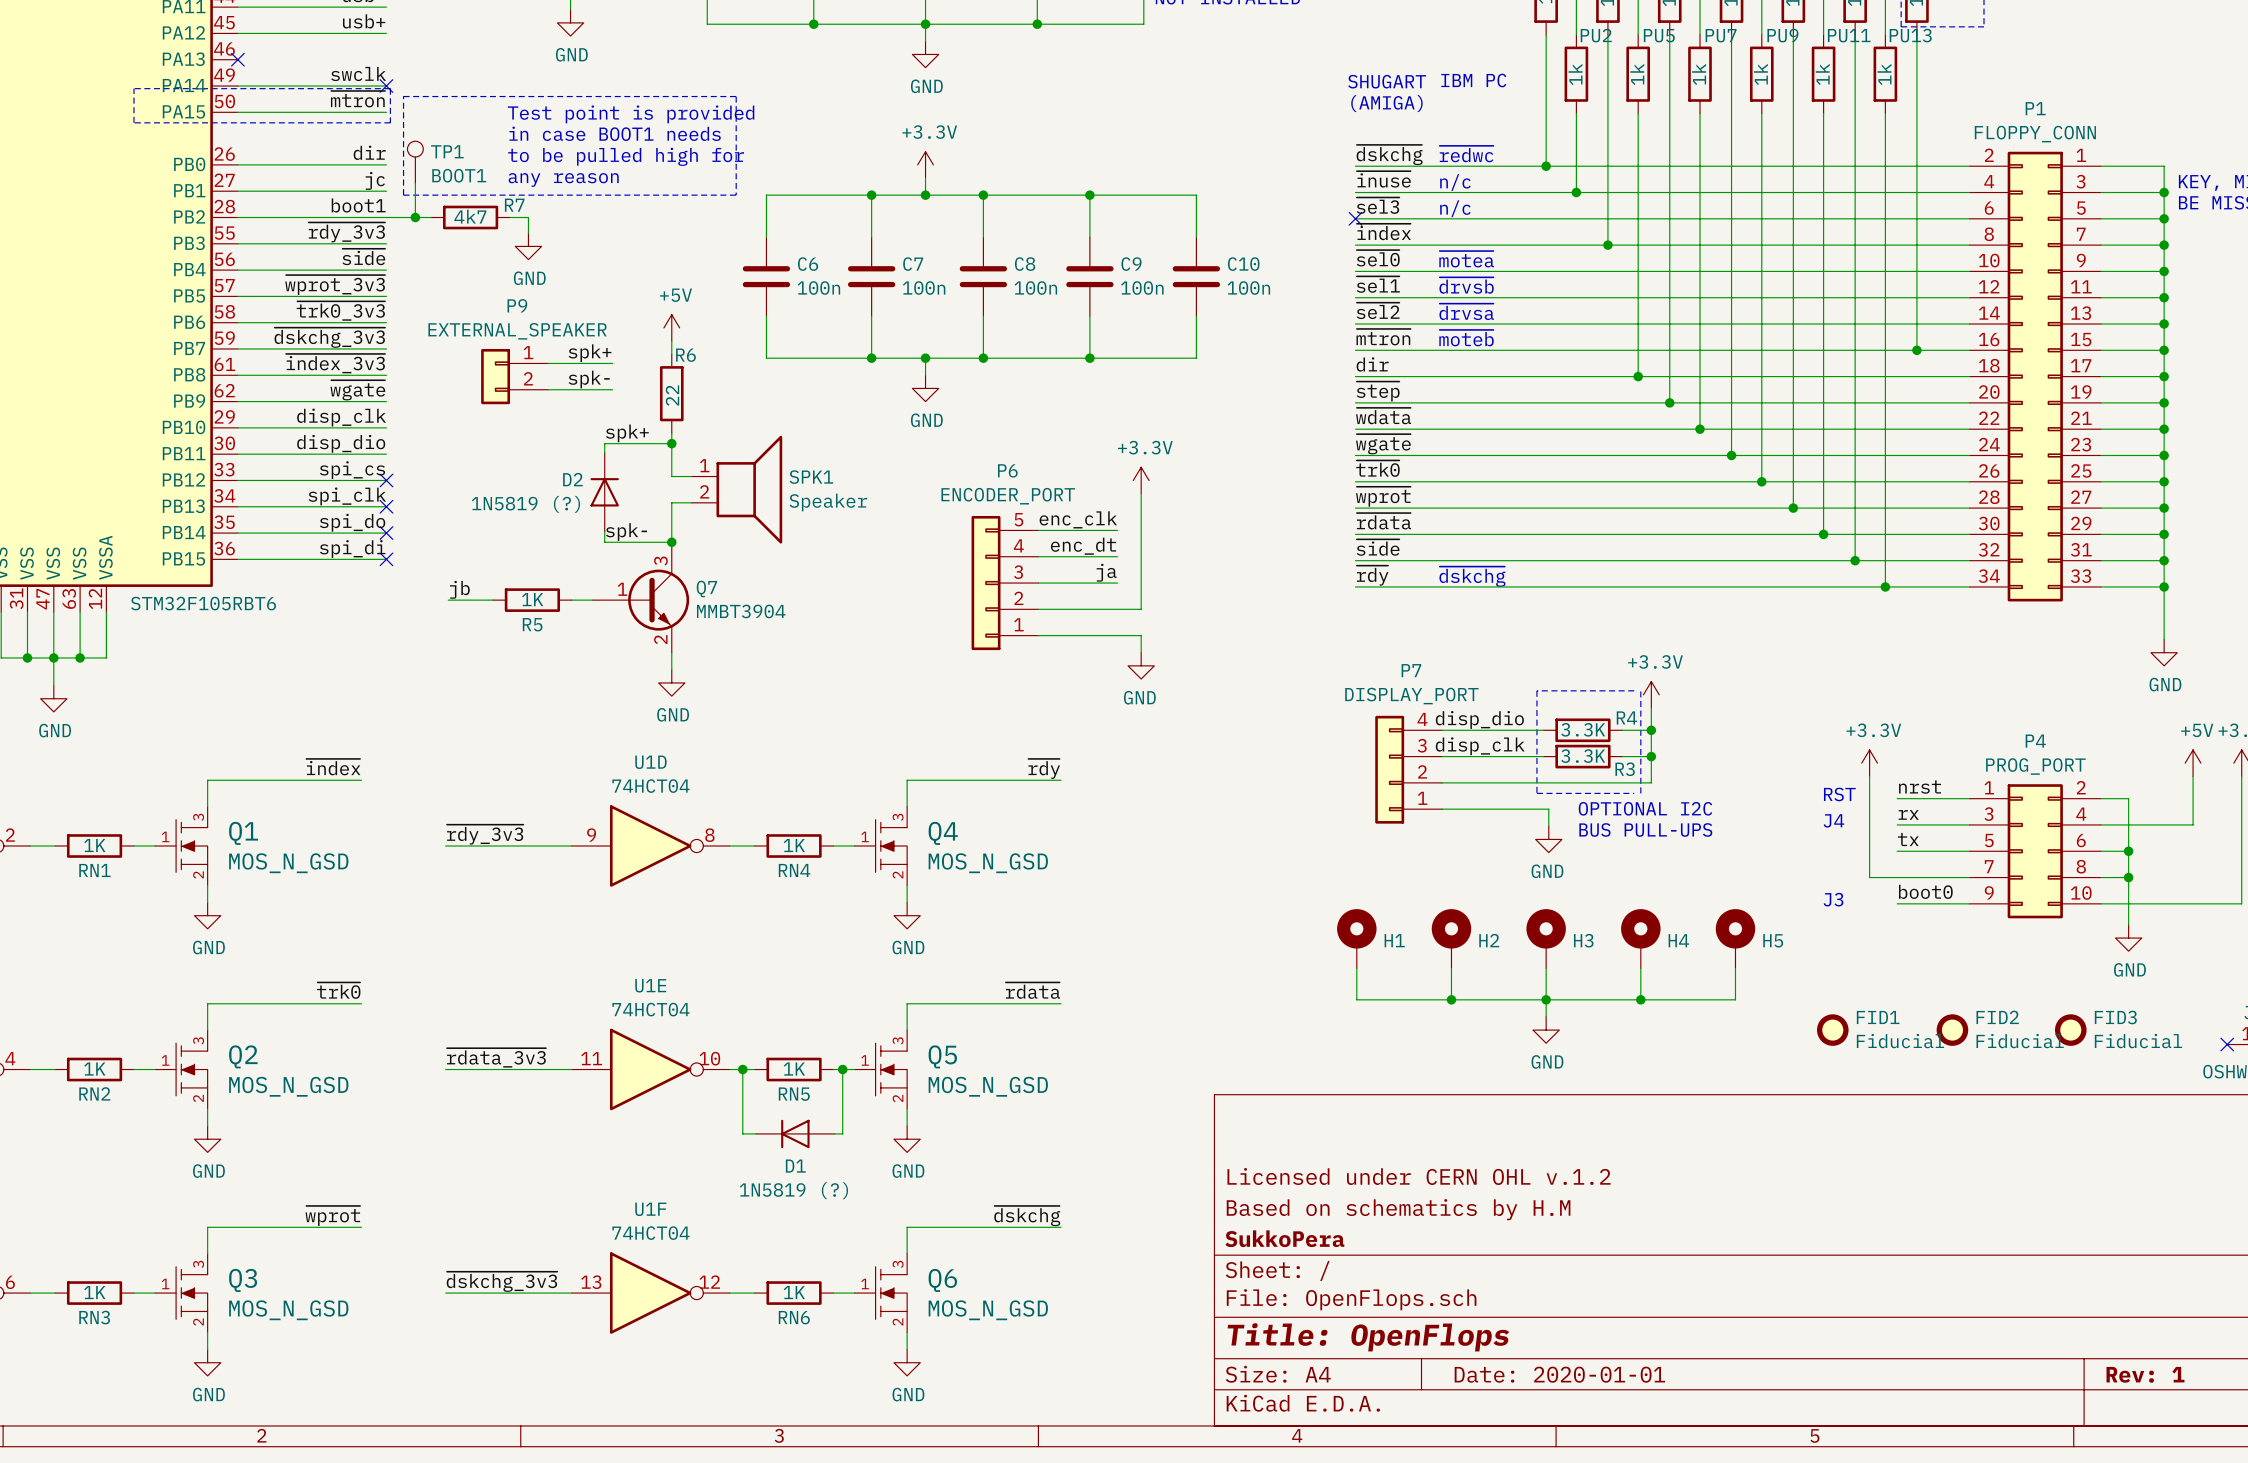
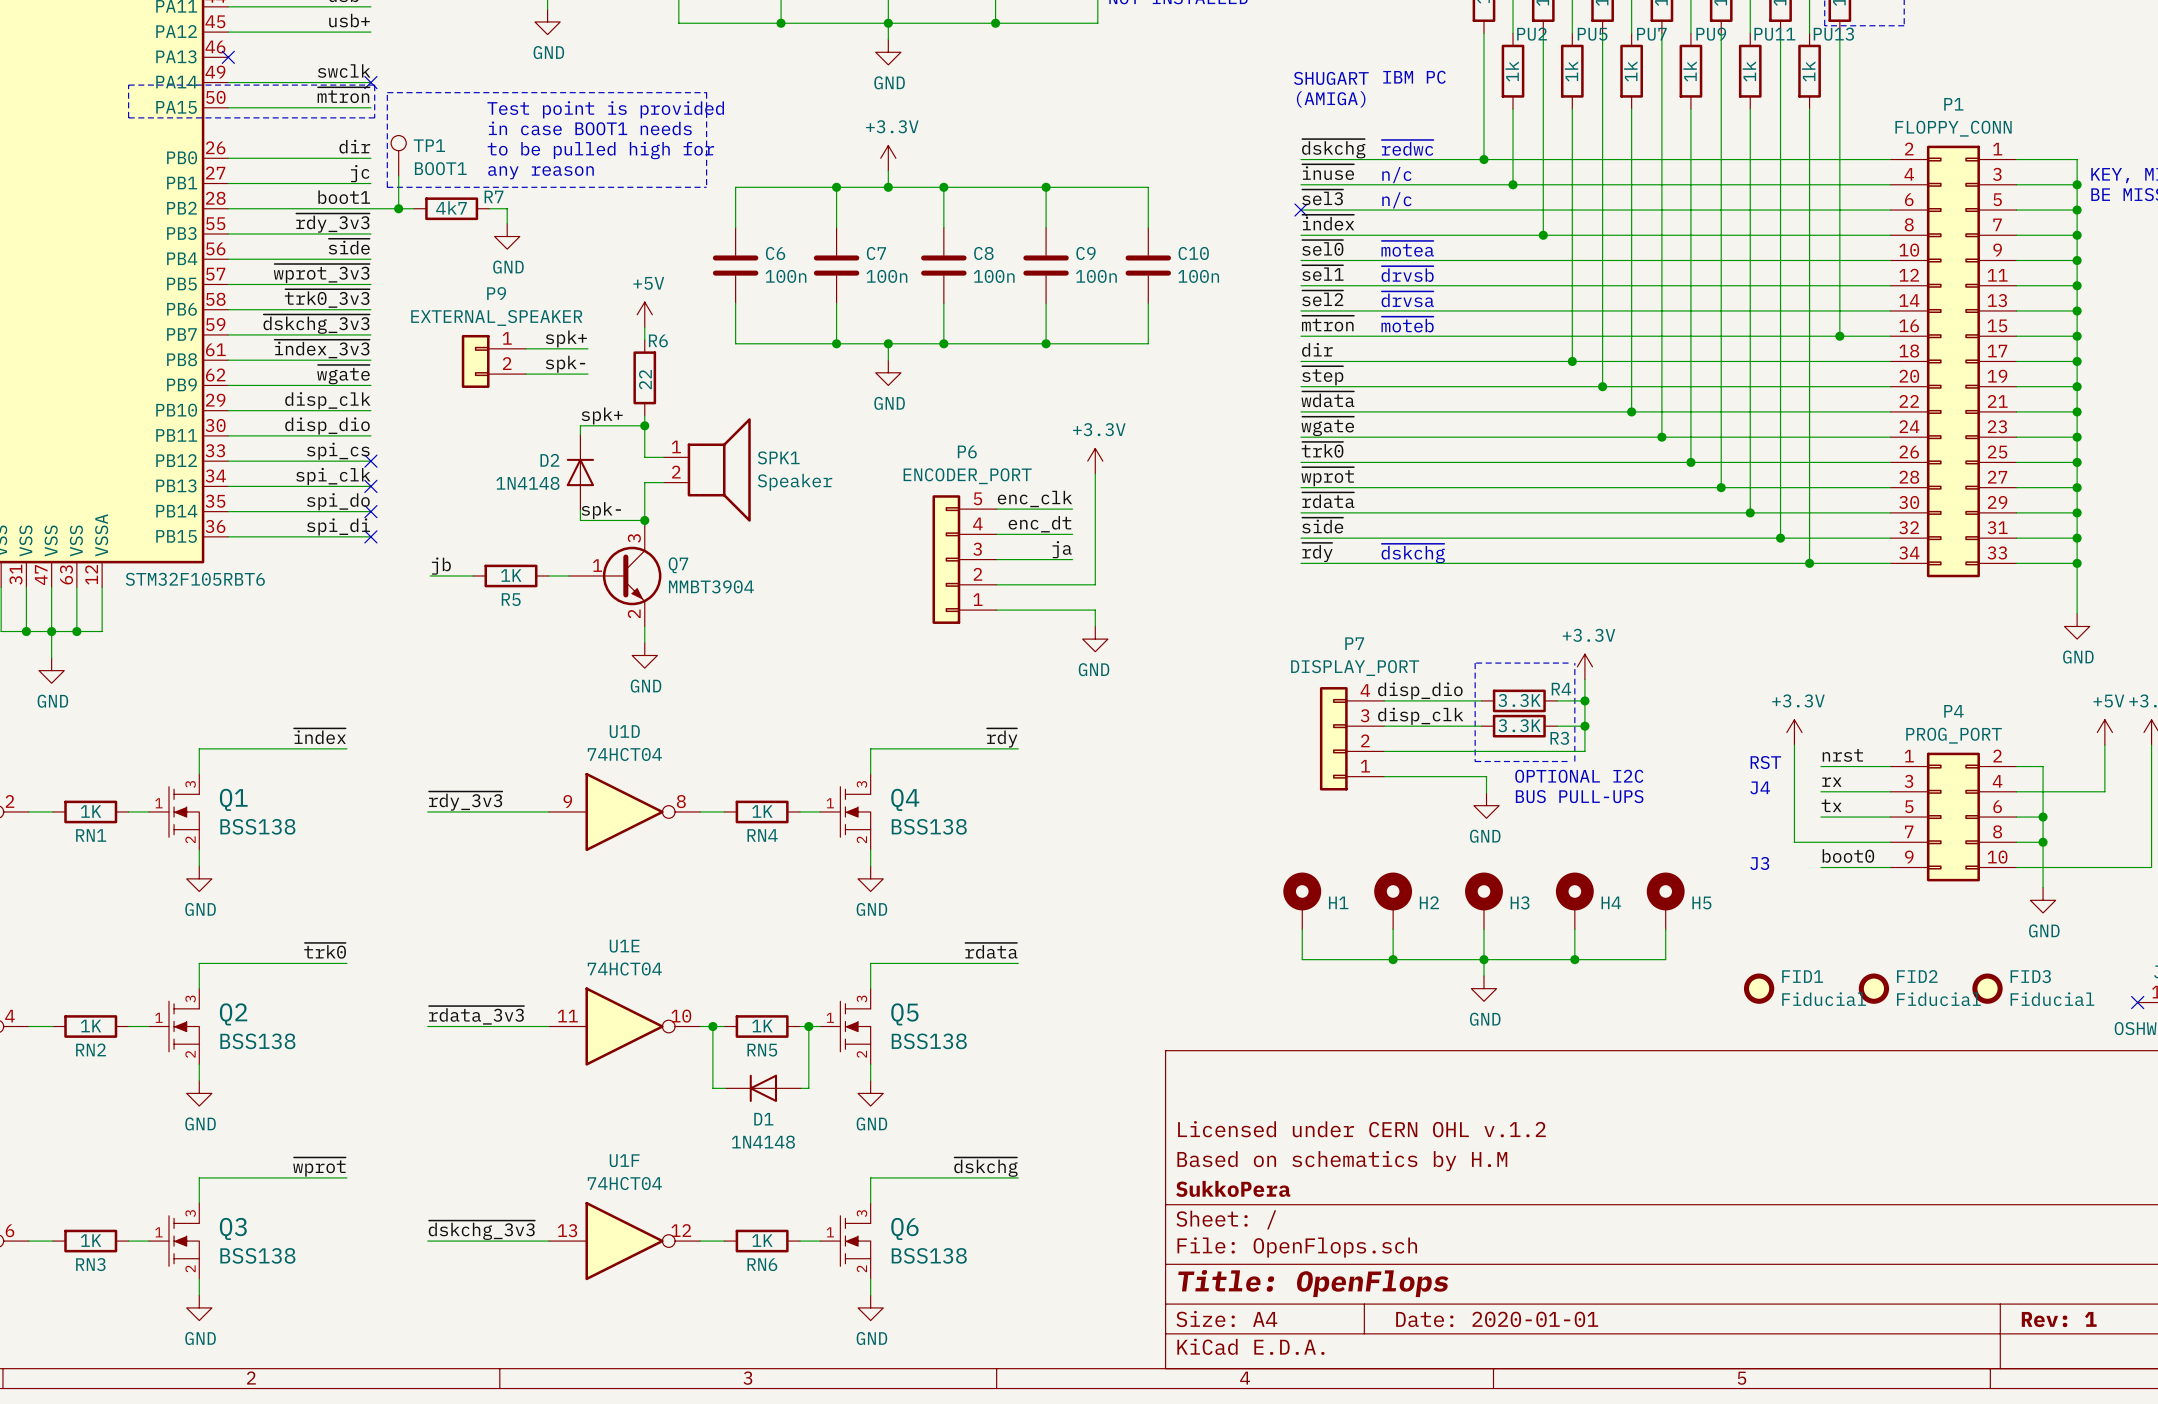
D2 value: 1N5819 (?) (526, 504) -> 1N4148 (527, 483)
Q1 value: MOS_N_GSD (288, 863) -> BSS138 (257, 826)
Q4 value: MOS_N_GSD (988, 863) -> BSS138 (929, 826)
Q2 value: MOS_N_GSD (288, 1086) -> BSS138 (257, 1041)
Q5 value: MOS_N_GSD (988, 1086) -> BSS138 (929, 1041)
D1 value: 1N5819 (?) (793, 1190) -> 1N4148 (763, 1142)
Q3 value: MOS_N_GSD (288, 1310) -> BSS138 (257, 1255)
Q6 value: MOS_N_GSD (988, 1310) -> BSS138 (929, 1255)

